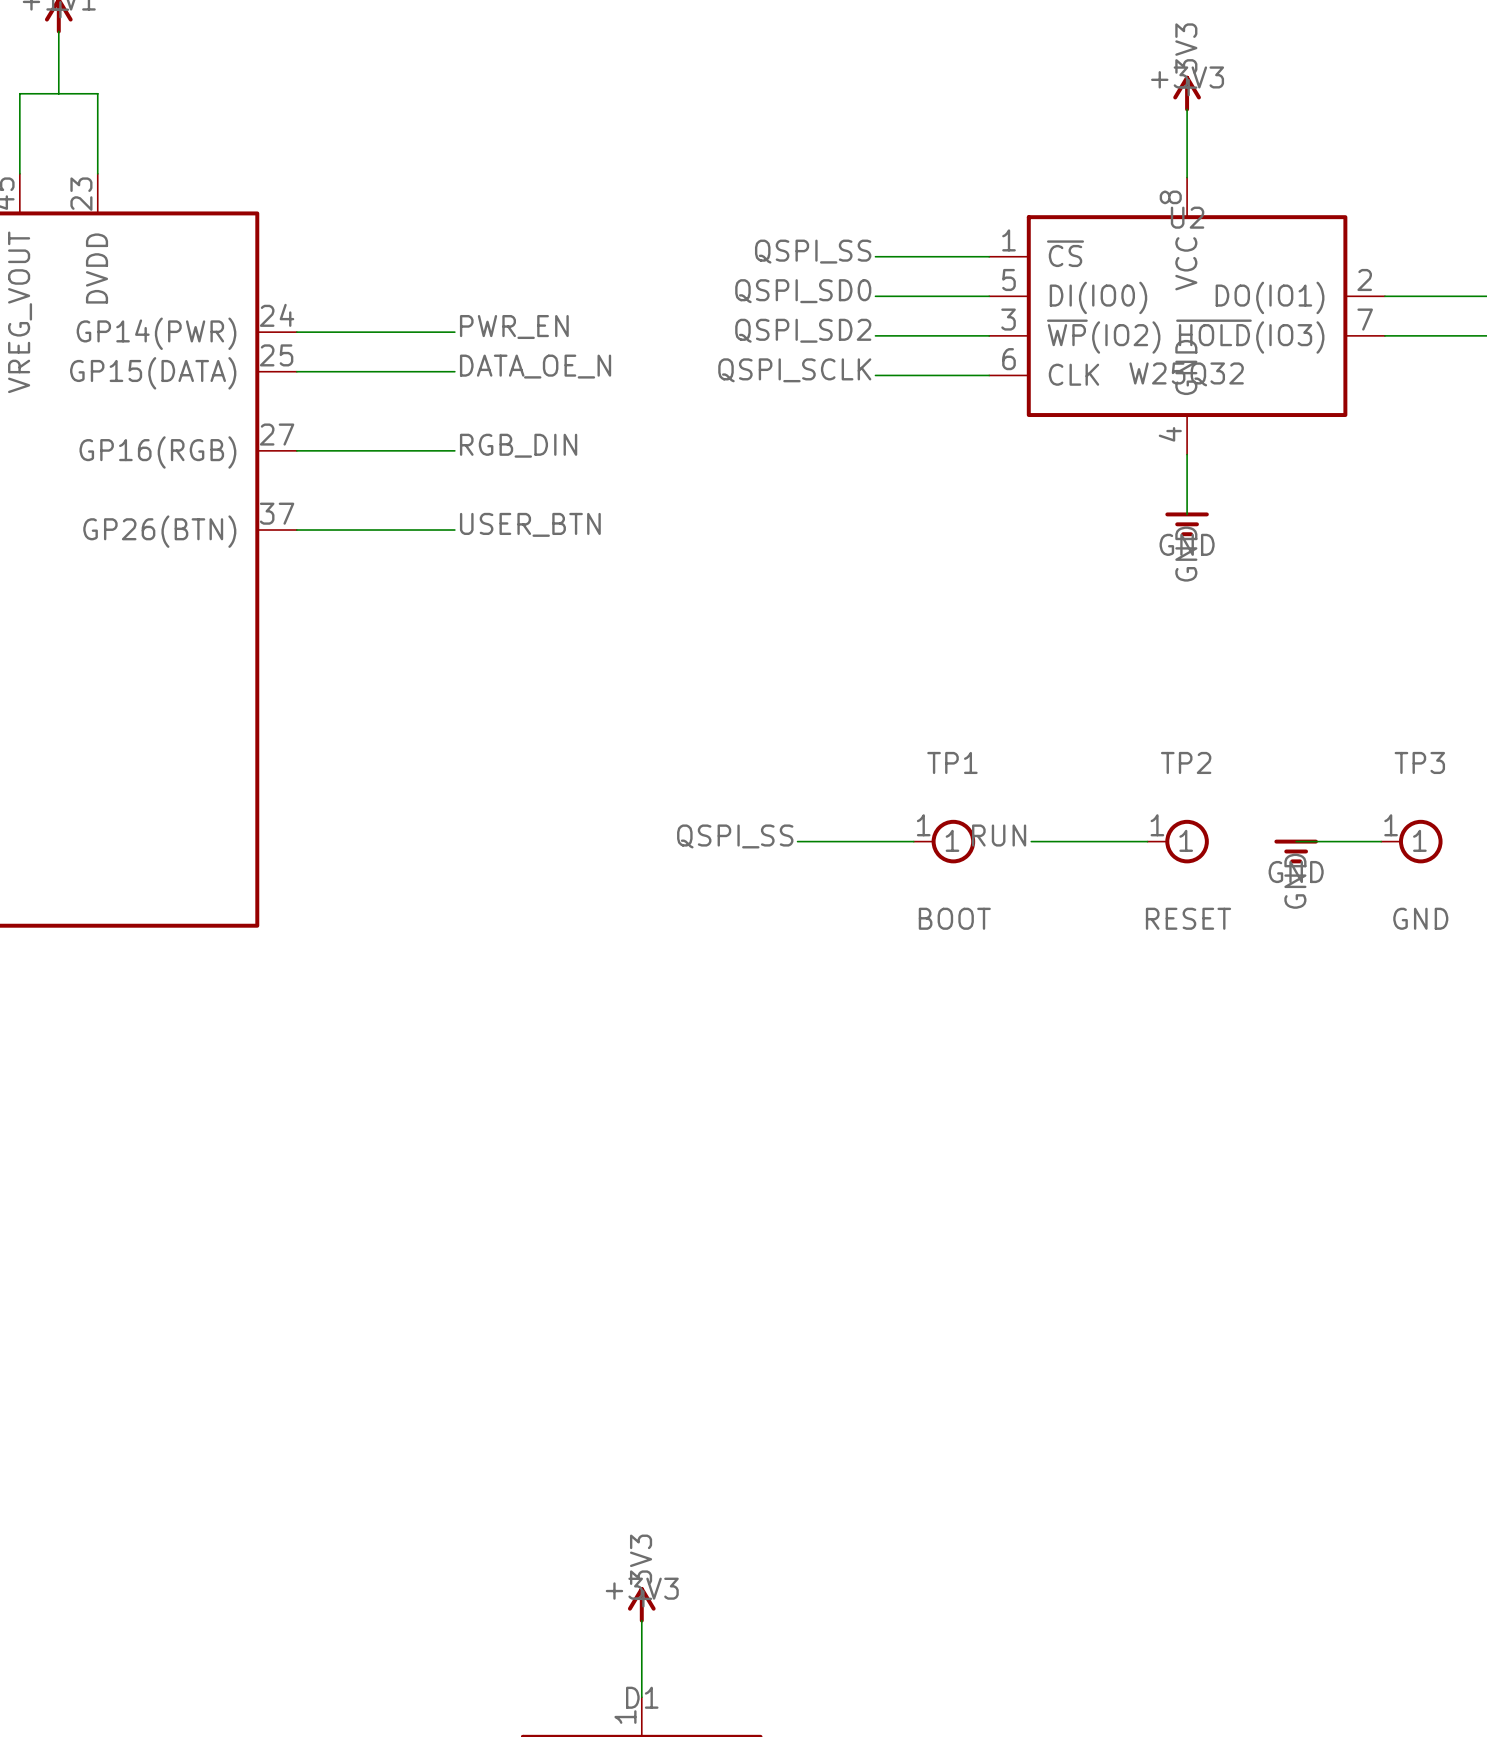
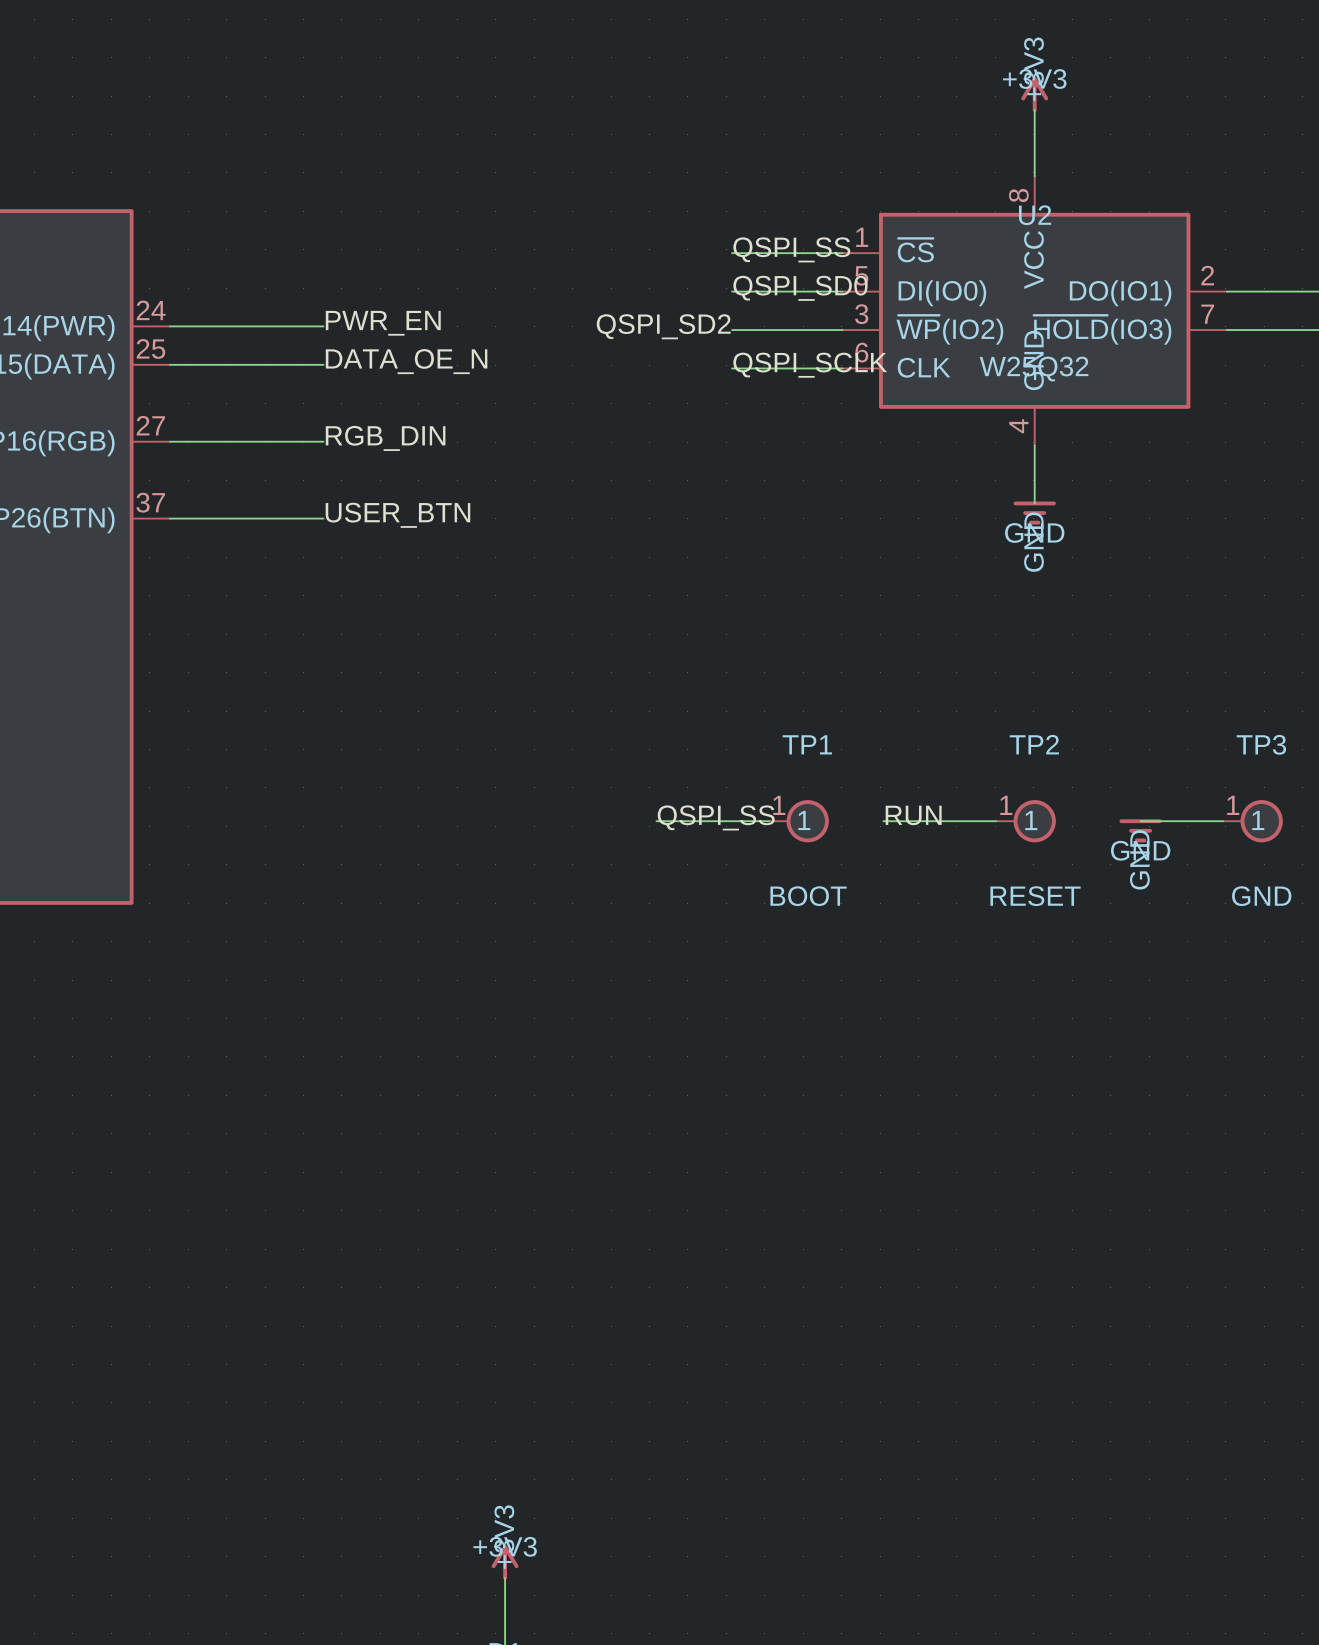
label position: QSPI_SS (813, 251) -> QSPI_SS (791, 249)
label position: QSPI_SD0 (803, 291) -> QSPI_SD0 (800, 288)
label position: QSPI_SCLK (794, 370) -> QSPI_SCLK (810, 365)
label position: RUN (999, 835) -> RUN (913, 815)
label position: QSPI_SS (735, 836) -> QSPI_SS (716, 817)

